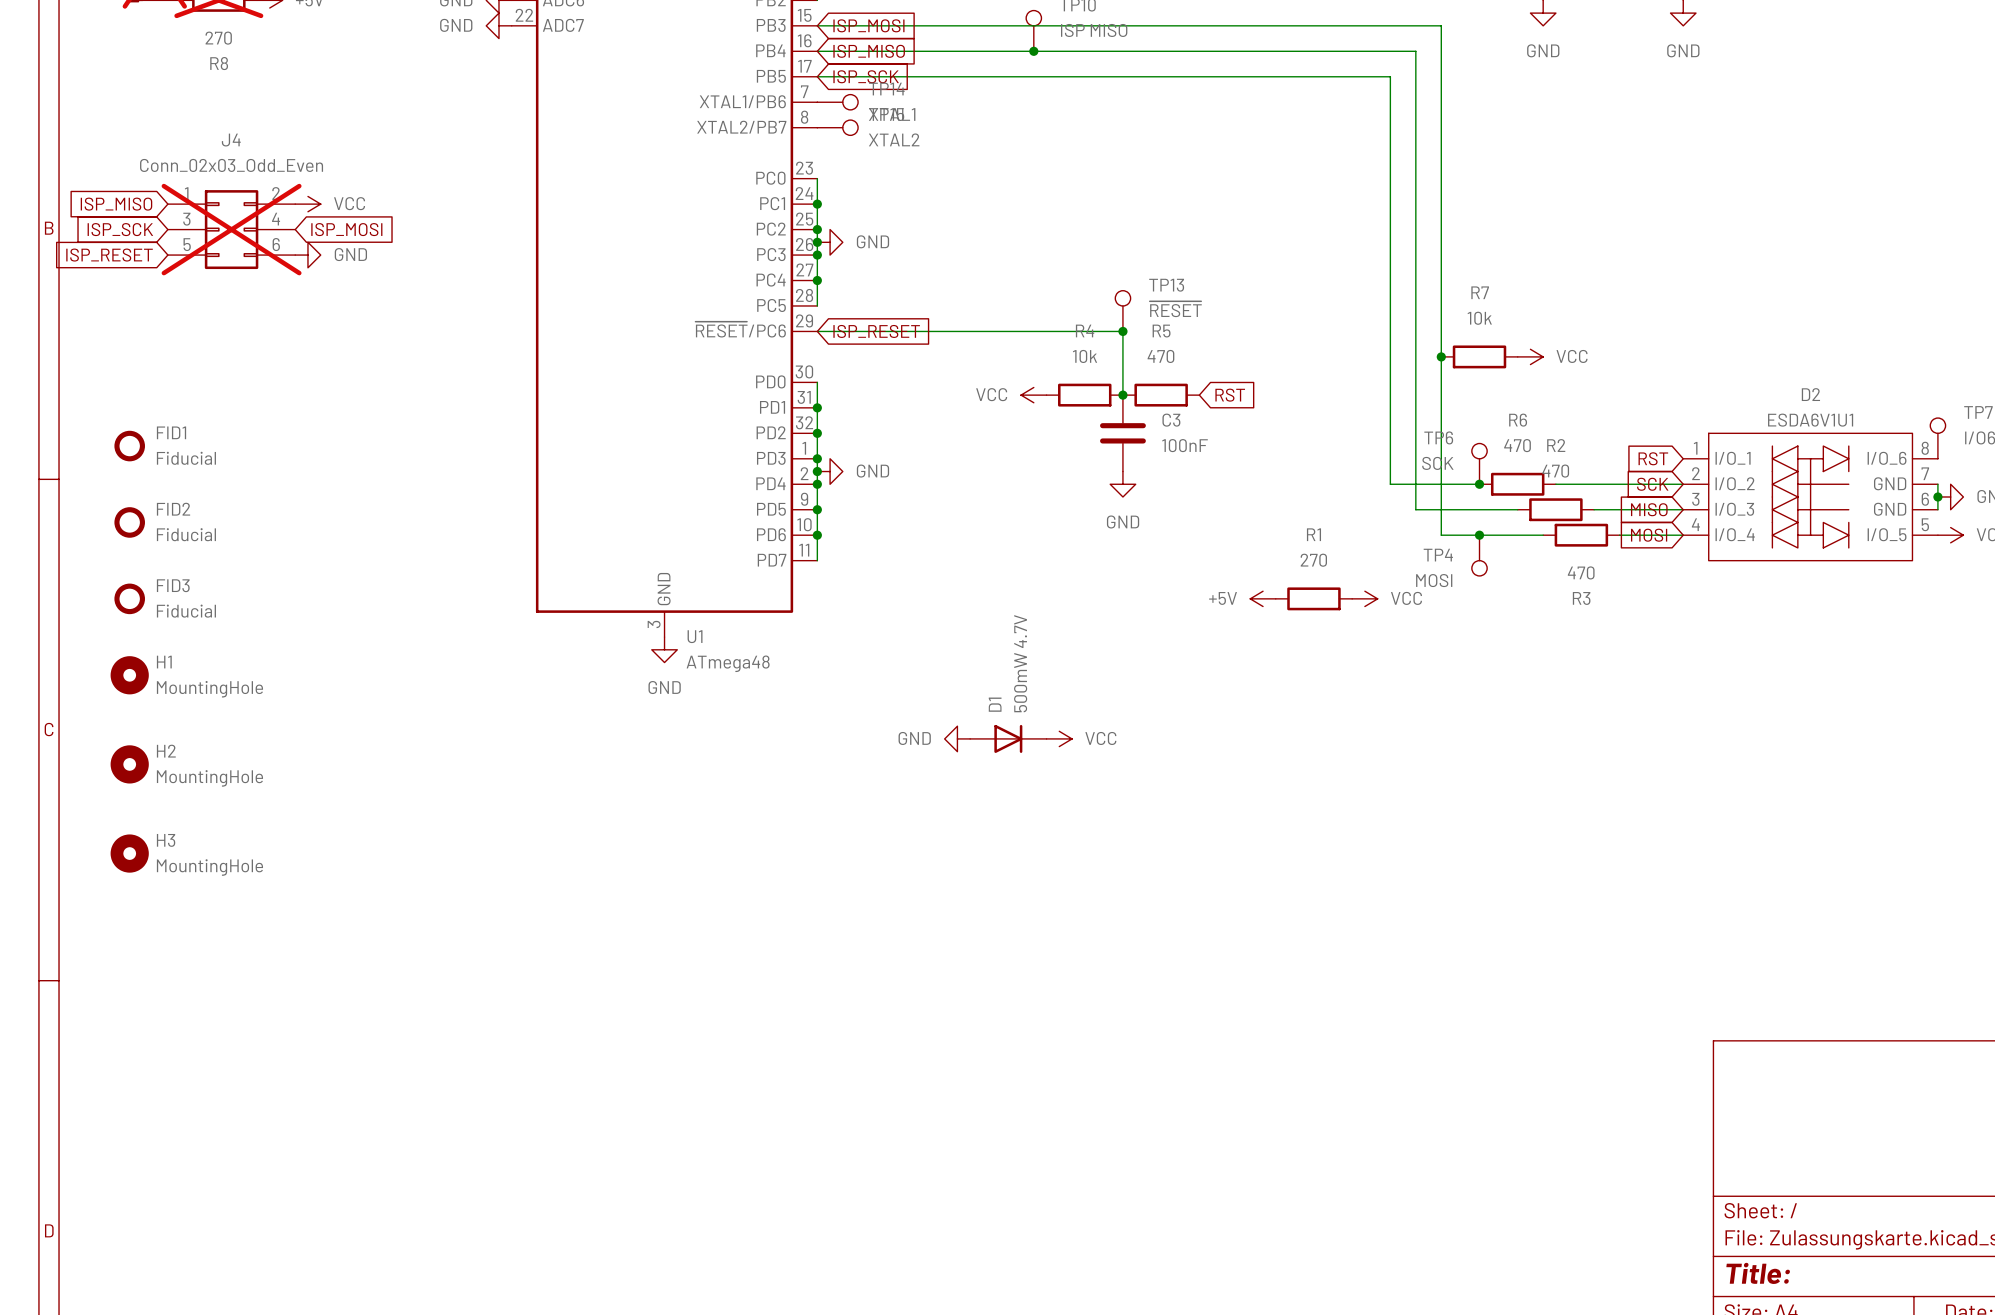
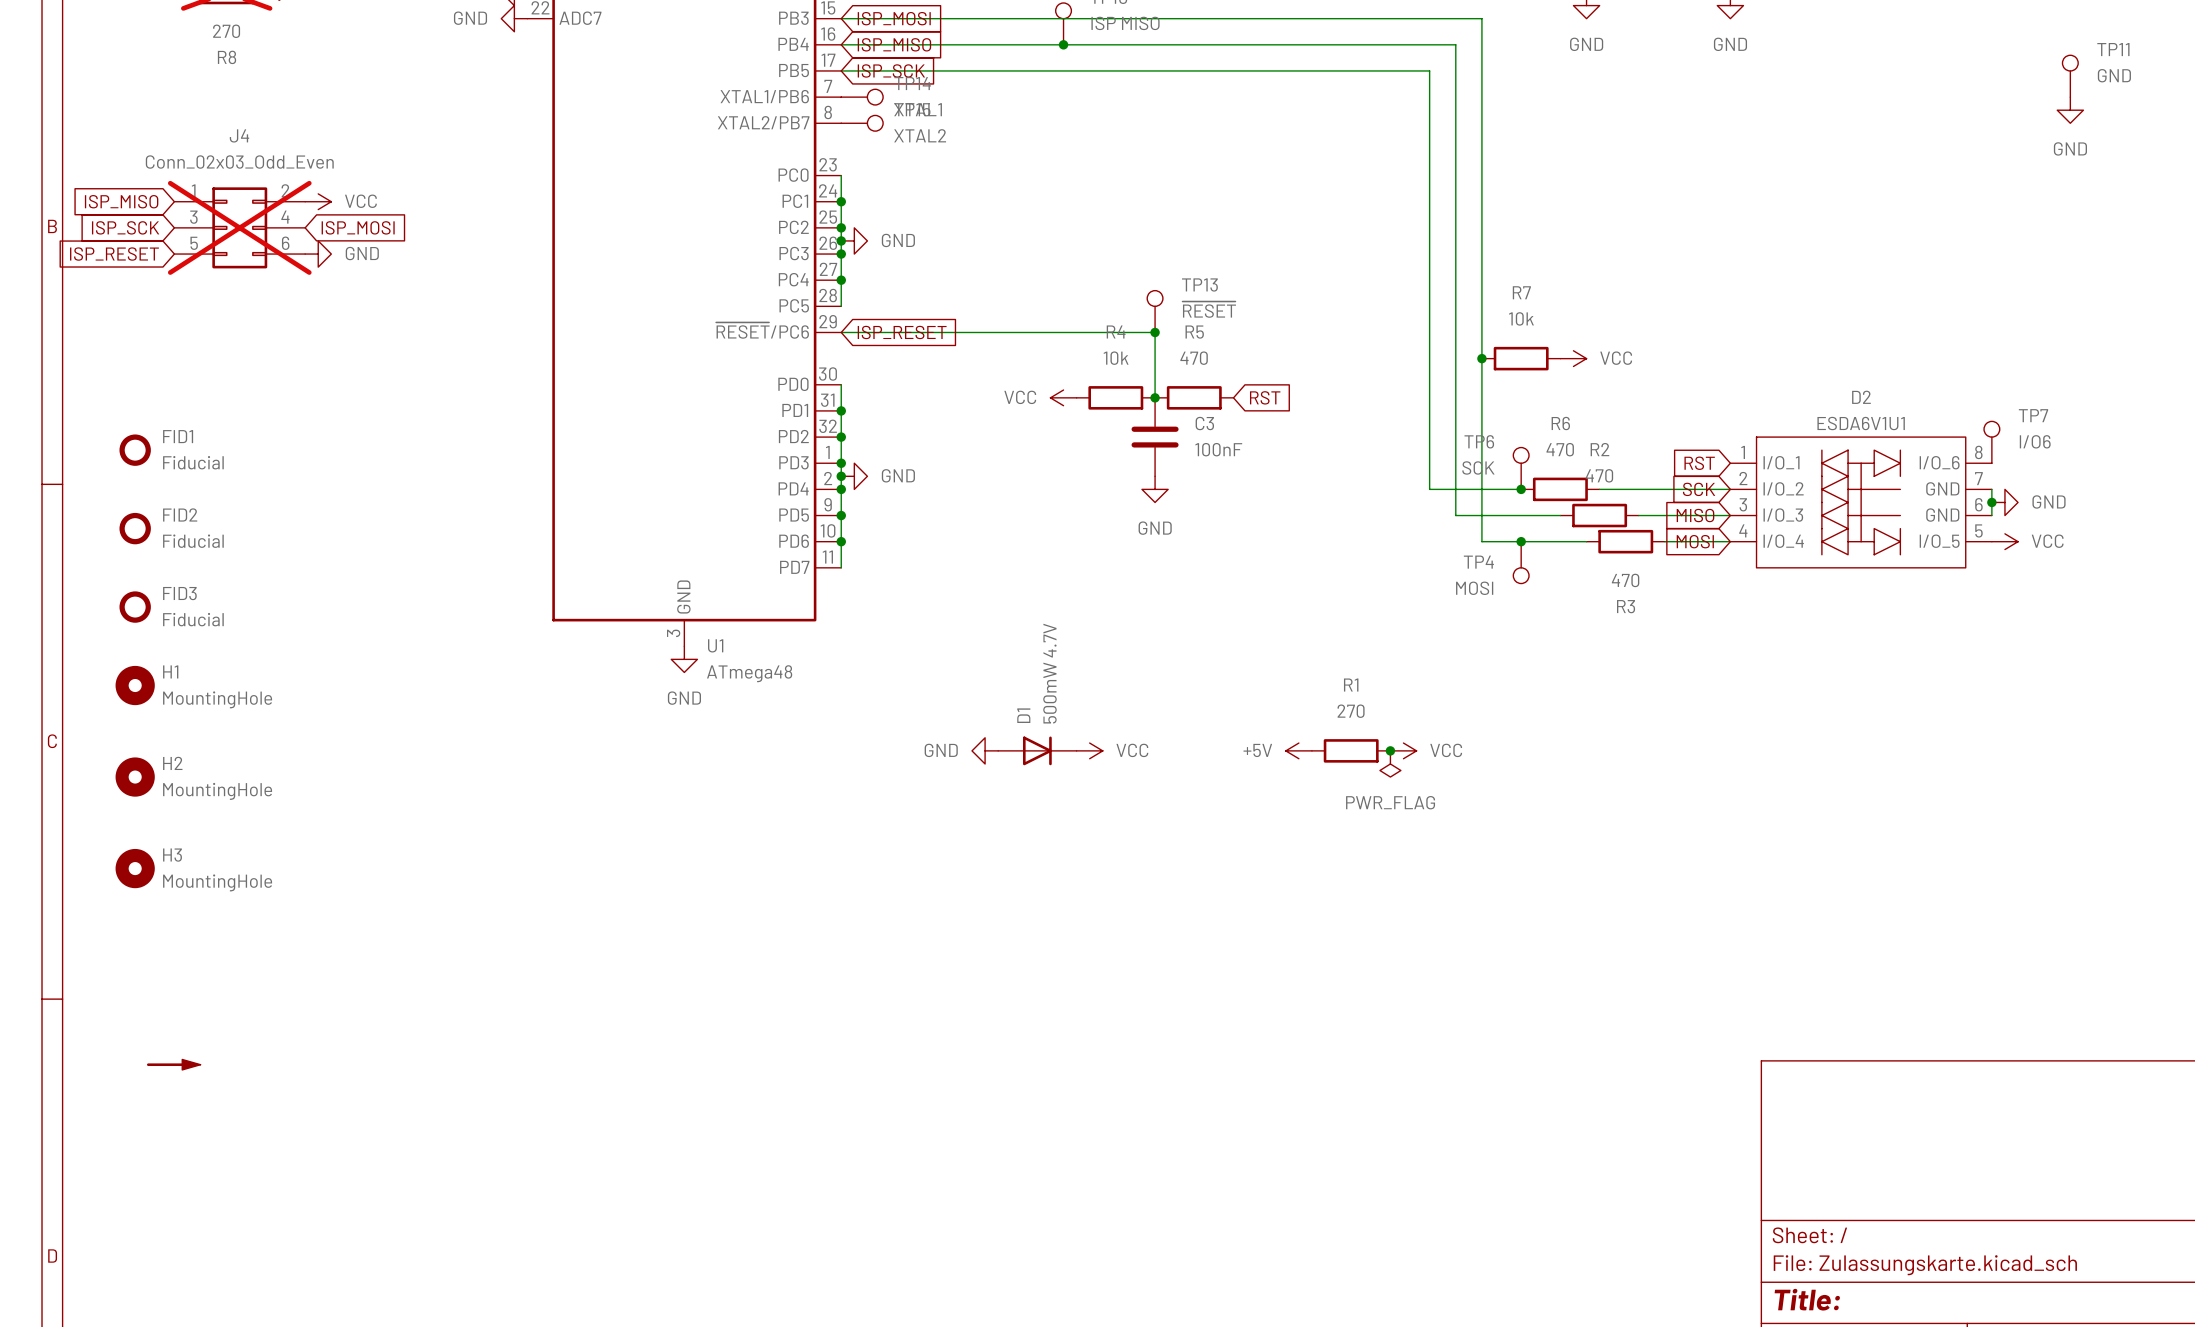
power symbol position: +5V (1263, 598) -> +5V (1298, 750)
R1 position: (1313, 598) -> (1351, 750)
power symbol position: VCC (1364, 598) -> VCC (1403, 750)
junction: none -> (1390, 750)
power symbol: none -> PWR_FLAG (1390, 763)
part: none -> (173, 1064)

